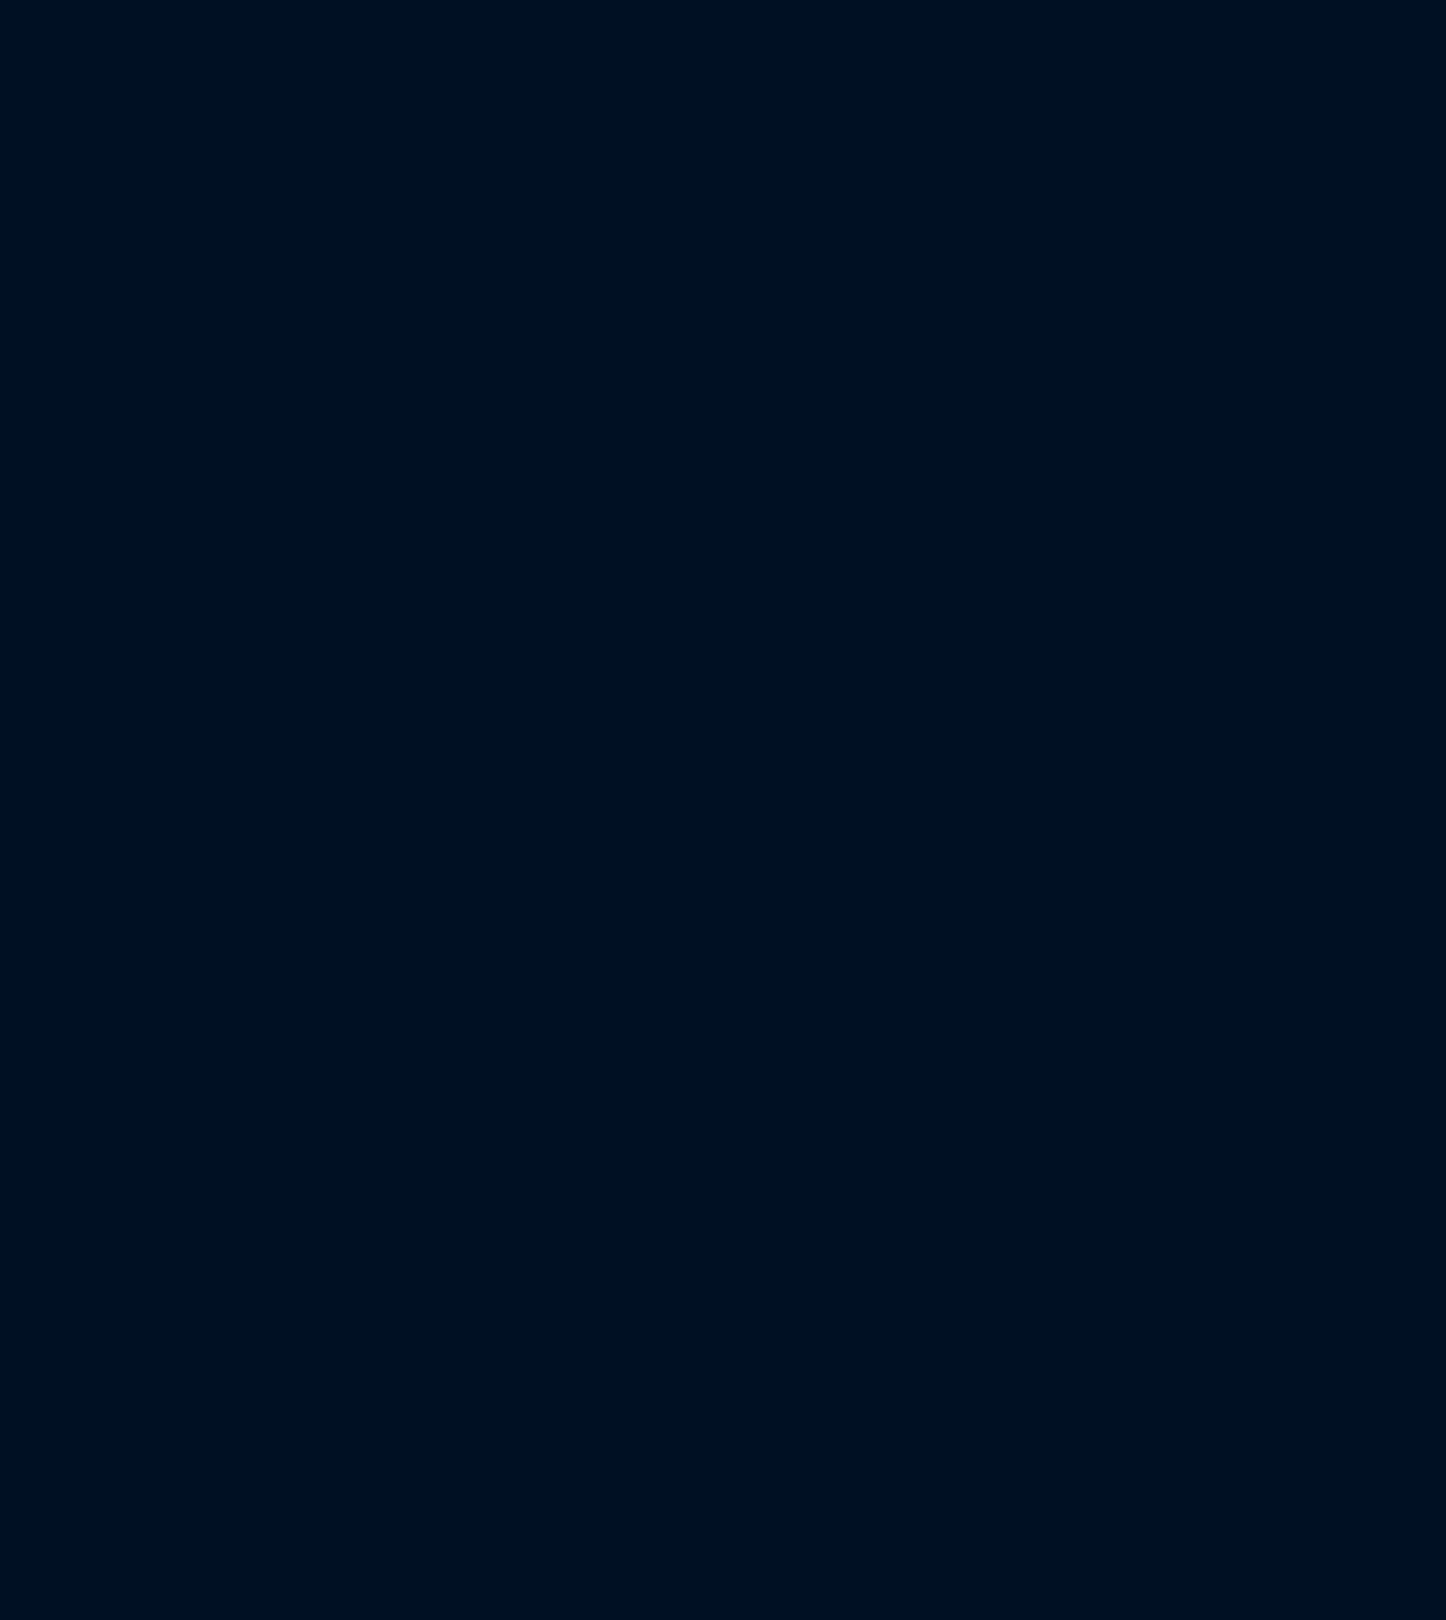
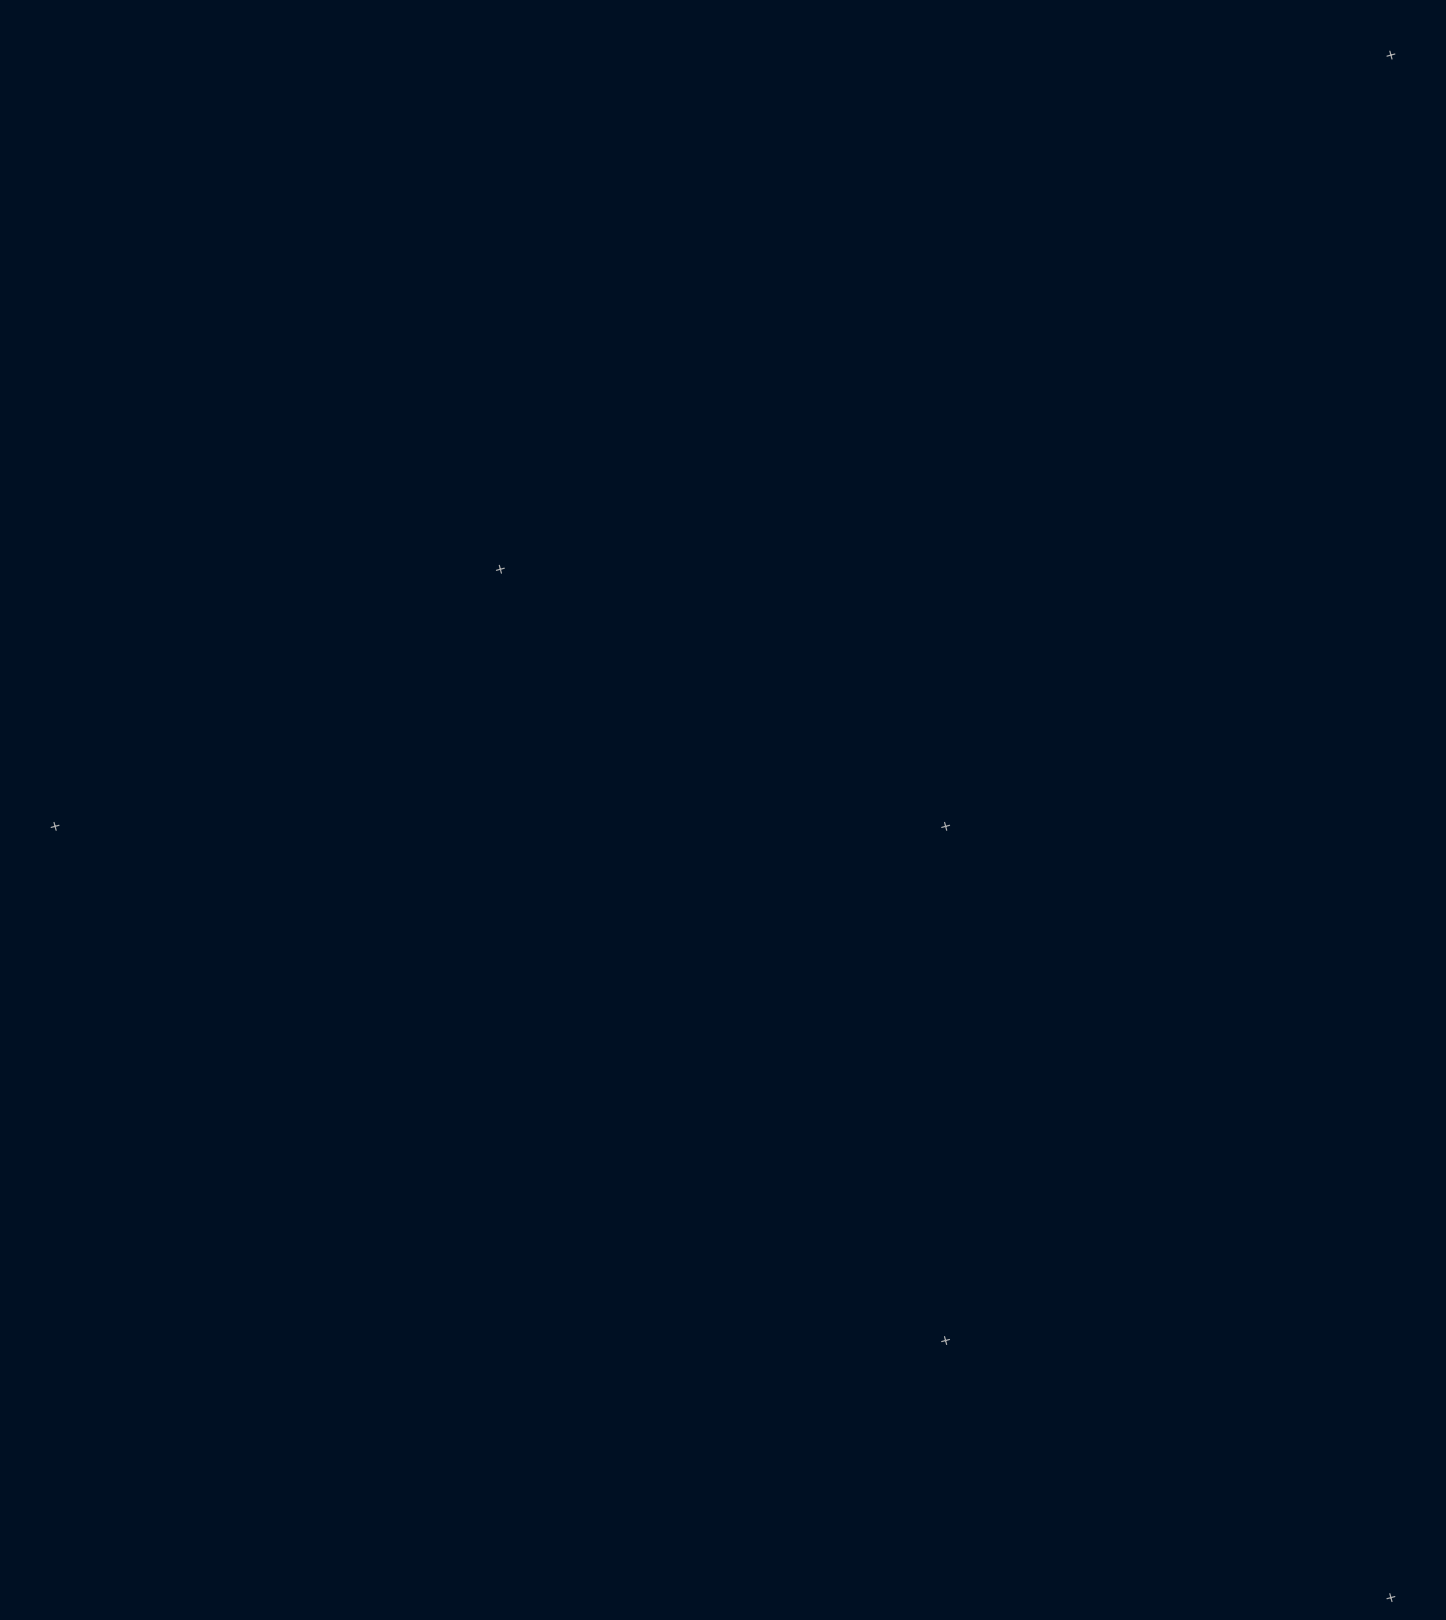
drawing: none -> [1386, 50, 1396, 60]
drawing: none -> [495, 564, 505, 574]
drawing: none -> [50, 821, 60, 831]
drawing: none -> [941, 821, 951, 831]
drawing: none -> [941, 1336, 951, 1346]
drawing: none -> [1386, 1593, 1396, 1603]

